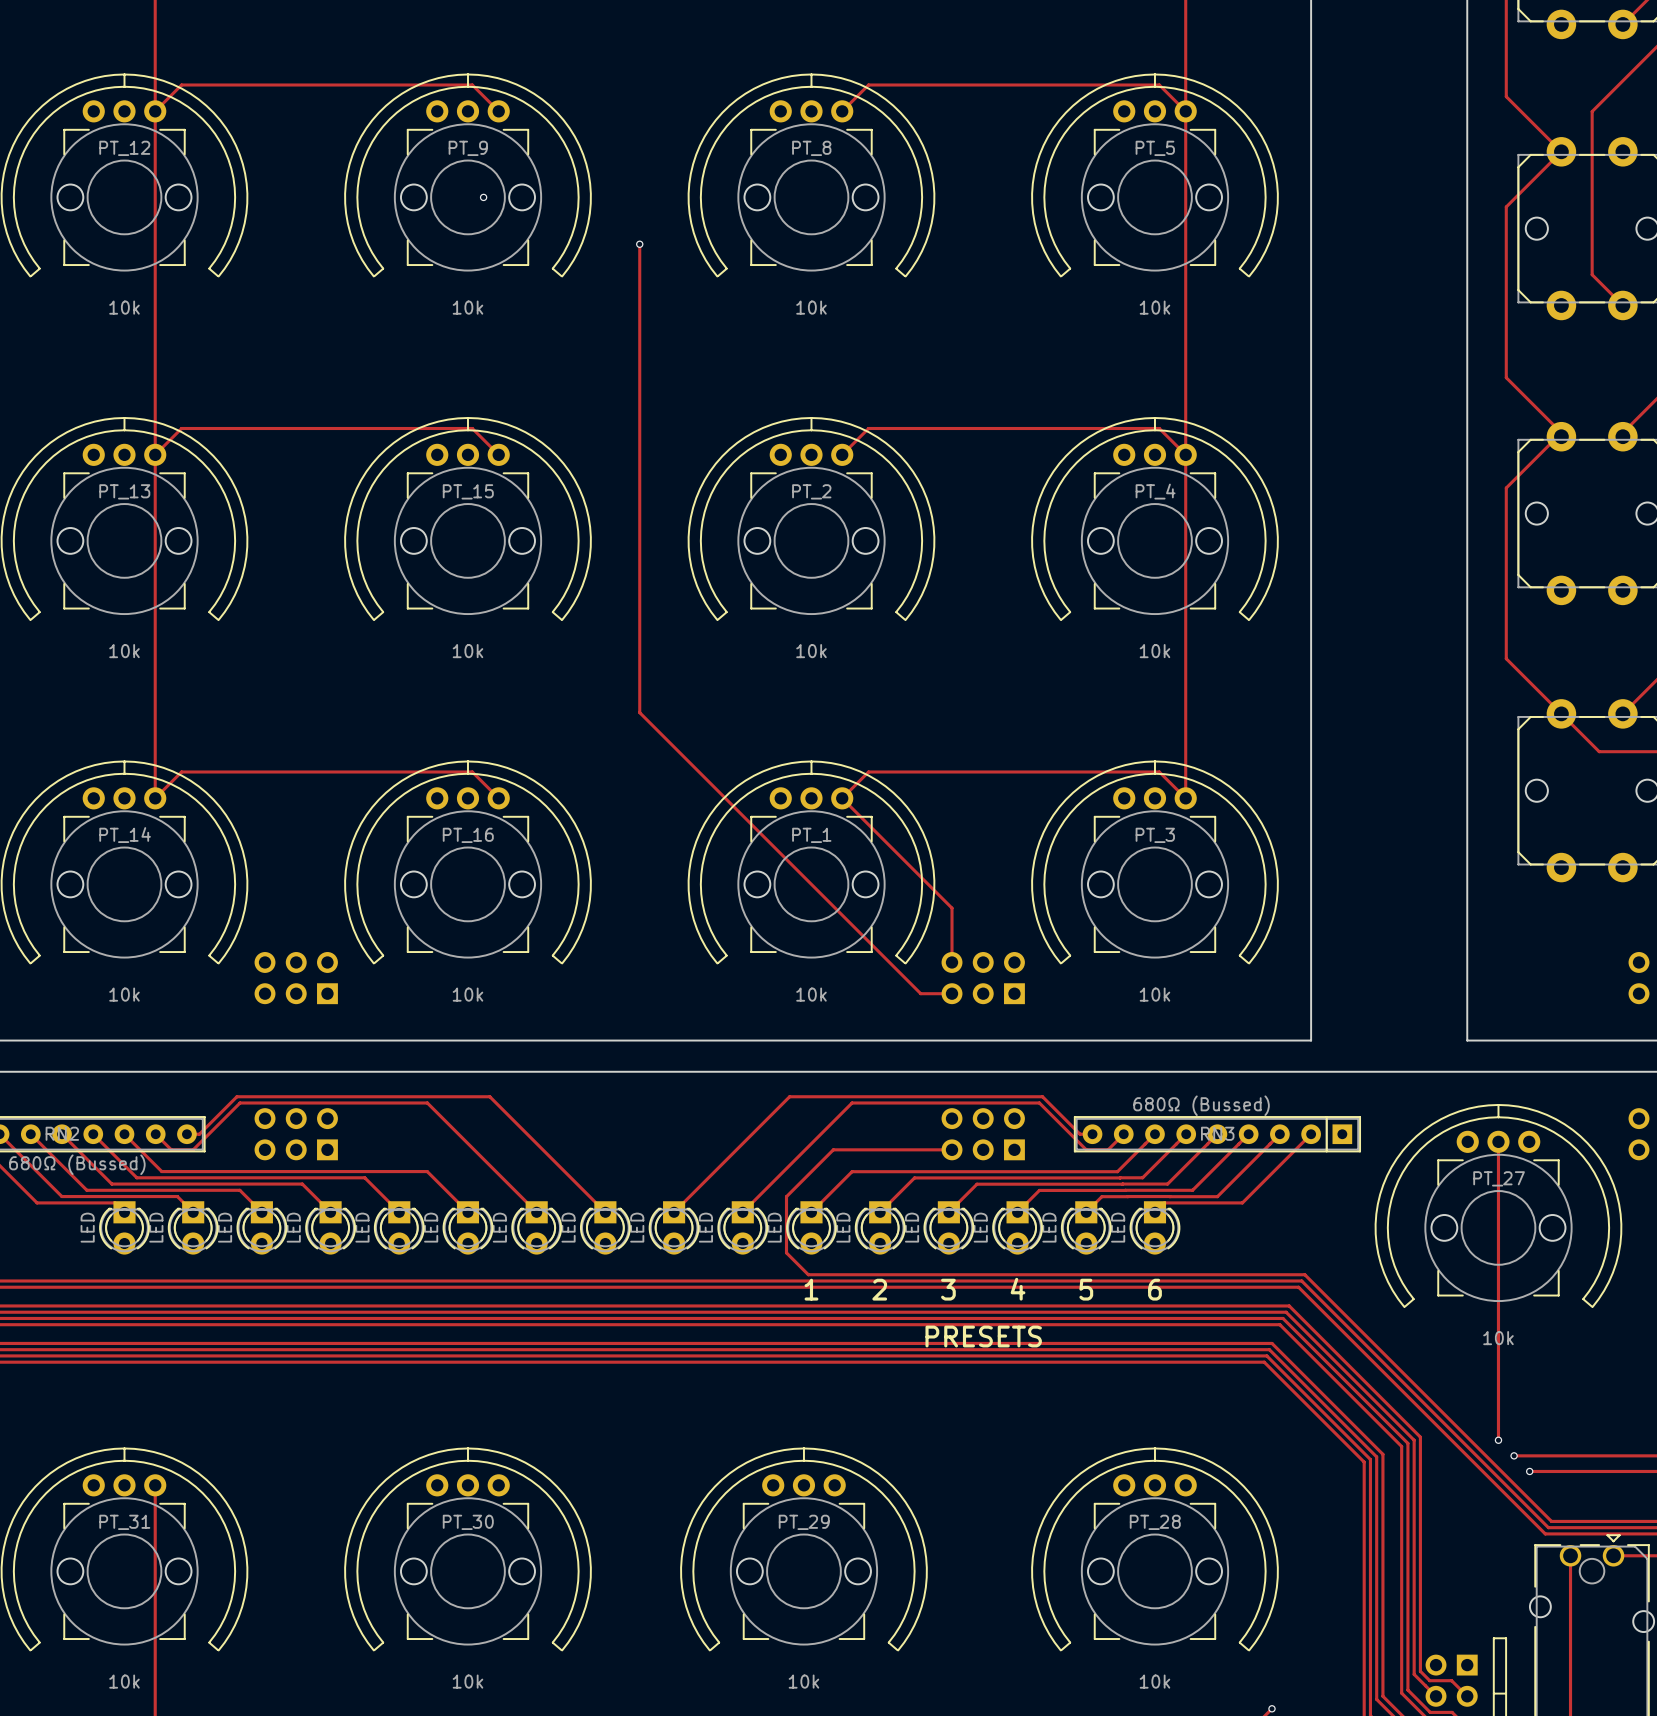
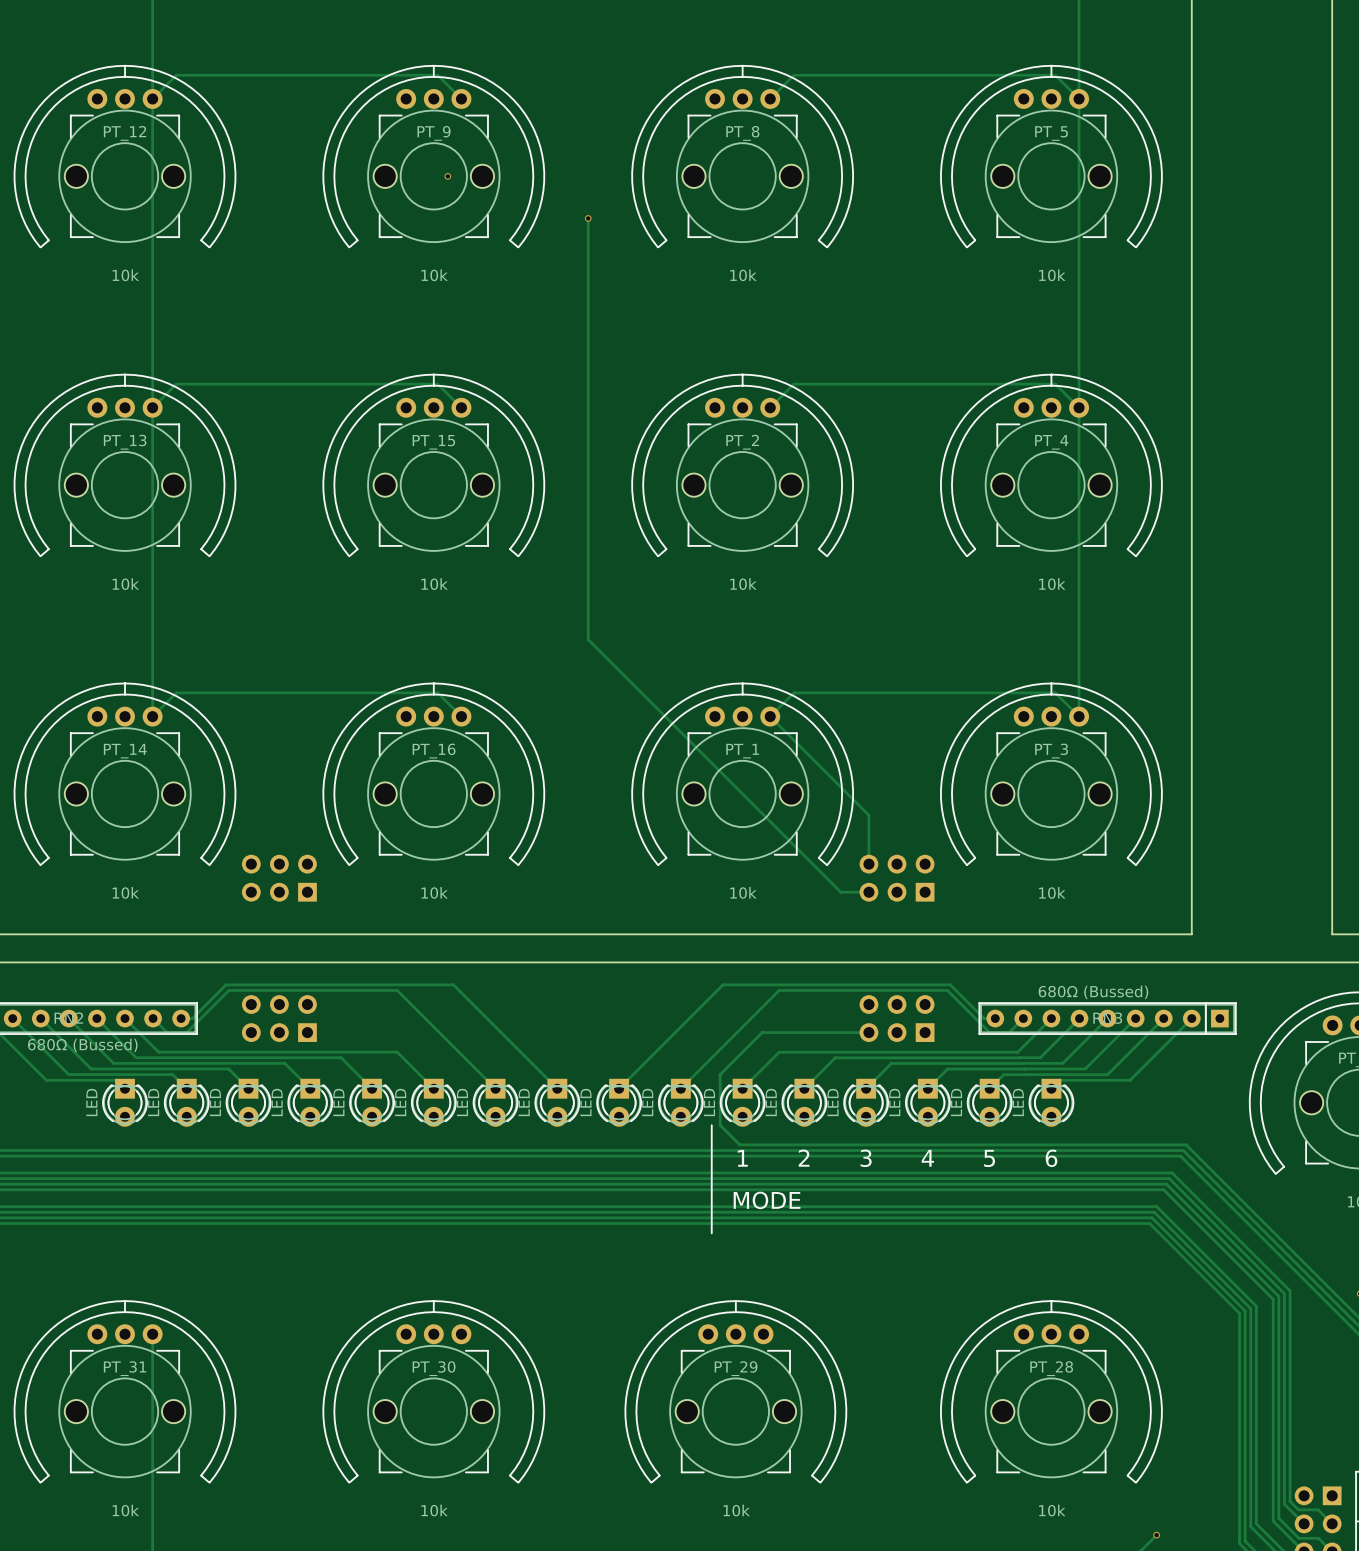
line: none -> (711, 1125) (711, 1233)
text: none -> MODE (767, 1200)
text: PRESETS (983, 1336) -> none

